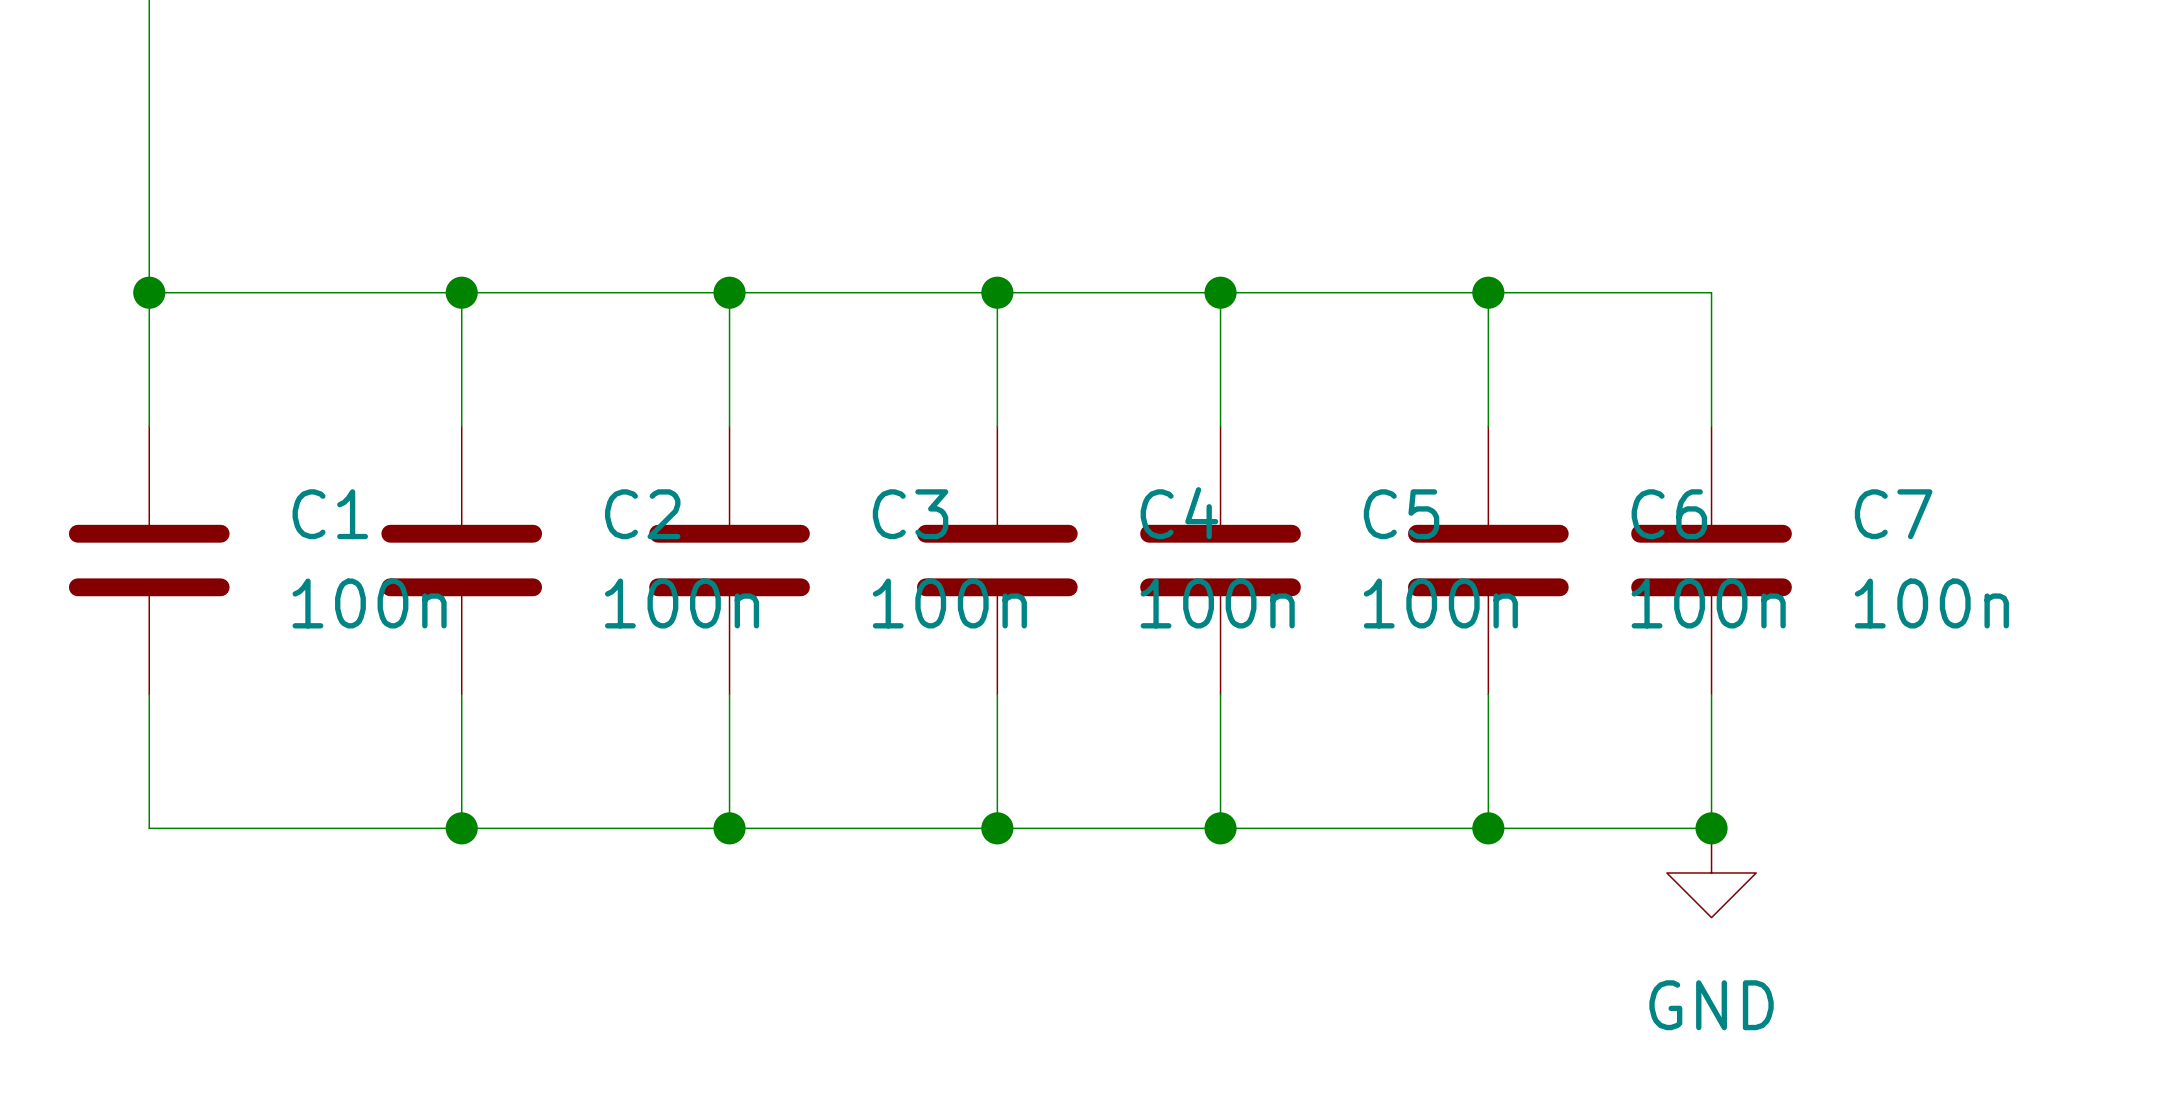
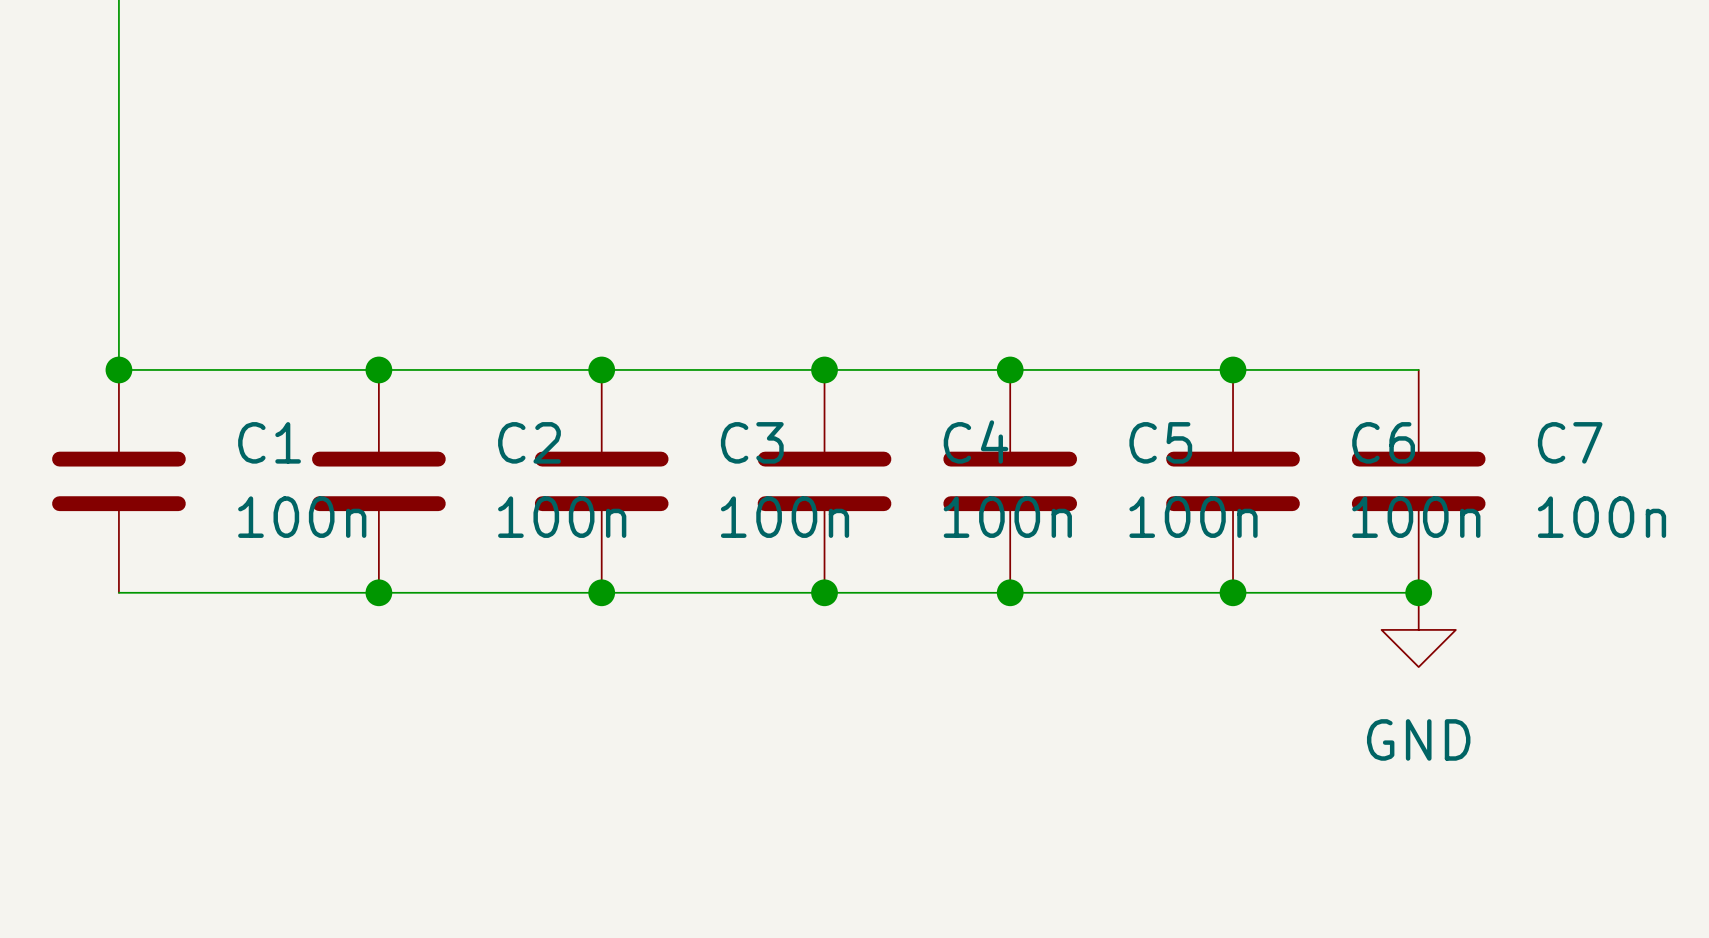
wire: (149, 292) (1711, 292) (1711, 426) -> (118, 369) (1418, 369)
junction position: (149, 292) -> (118, 369)
wire: (461, 292) (461, 426) -> none
junction position: (461, 292) -> (378, 369)
wire: (729, 292) (729, 426) -> none
junction position: (729, 292) -> (601, 369)
wire: (997, 292) (997, 426) -> none
junction: (997, 292) -> none
wire: (1220, 292) (1220, 426) -> none
junction: (1220, 292) -> none
wire: (1488, 292) (1488, 426) -> none
junction position: (1488, 292) -> (1233, 369)
junction: none -> (824, 369)
junction: none -> (1010, 369)
wire: (149, 694) (149, 828) (1711, 828) (1711, 694) -> (118, 592) (1418, 592)
wire: (461, 694) (461, 828) -> none
wire: (729, 694) (729, 828) -> none
wire: (997, 694) (997, 828) -> none
junction: none -> (824, 592)
wire: (1220, 694) (1220, 828) -> none
junction: none -> (1010, 592)
wire: (1488, 694) (1488, 828) -> none
junction: none -> (1233, 592)
junction: none -> (1418, 592)
junction position: (461, 828) -> (378, 592)
junction position: (729, 828) -> (601, 592)
junction: (997, 828) -> none
junction: (1220, 828) -> none
junction: (1488, 828) -> none
junction: (1711, 828) -> none
power symbol position: GND (1711, 872) -> GND (1418, 629)

